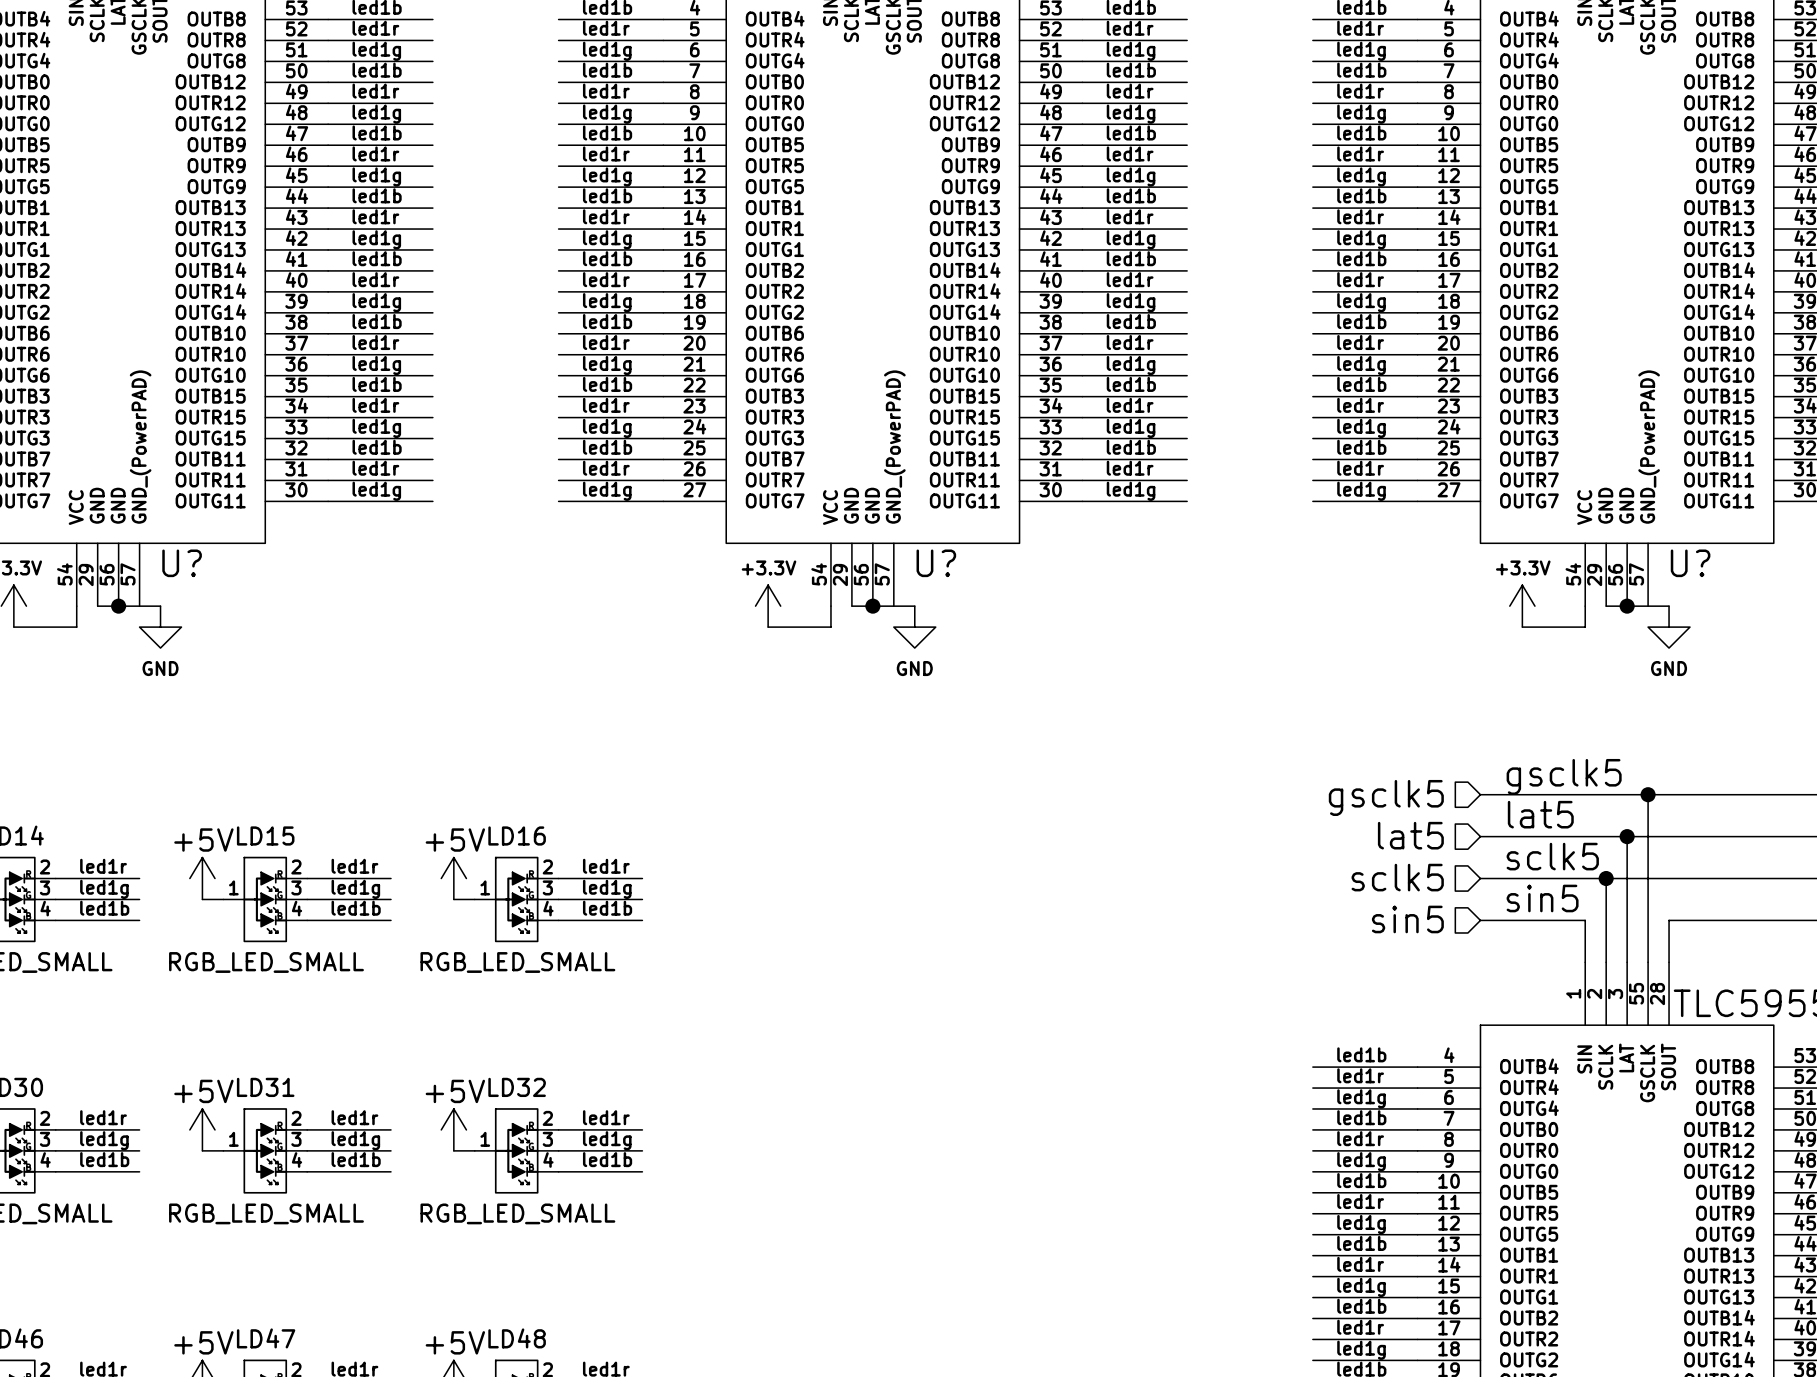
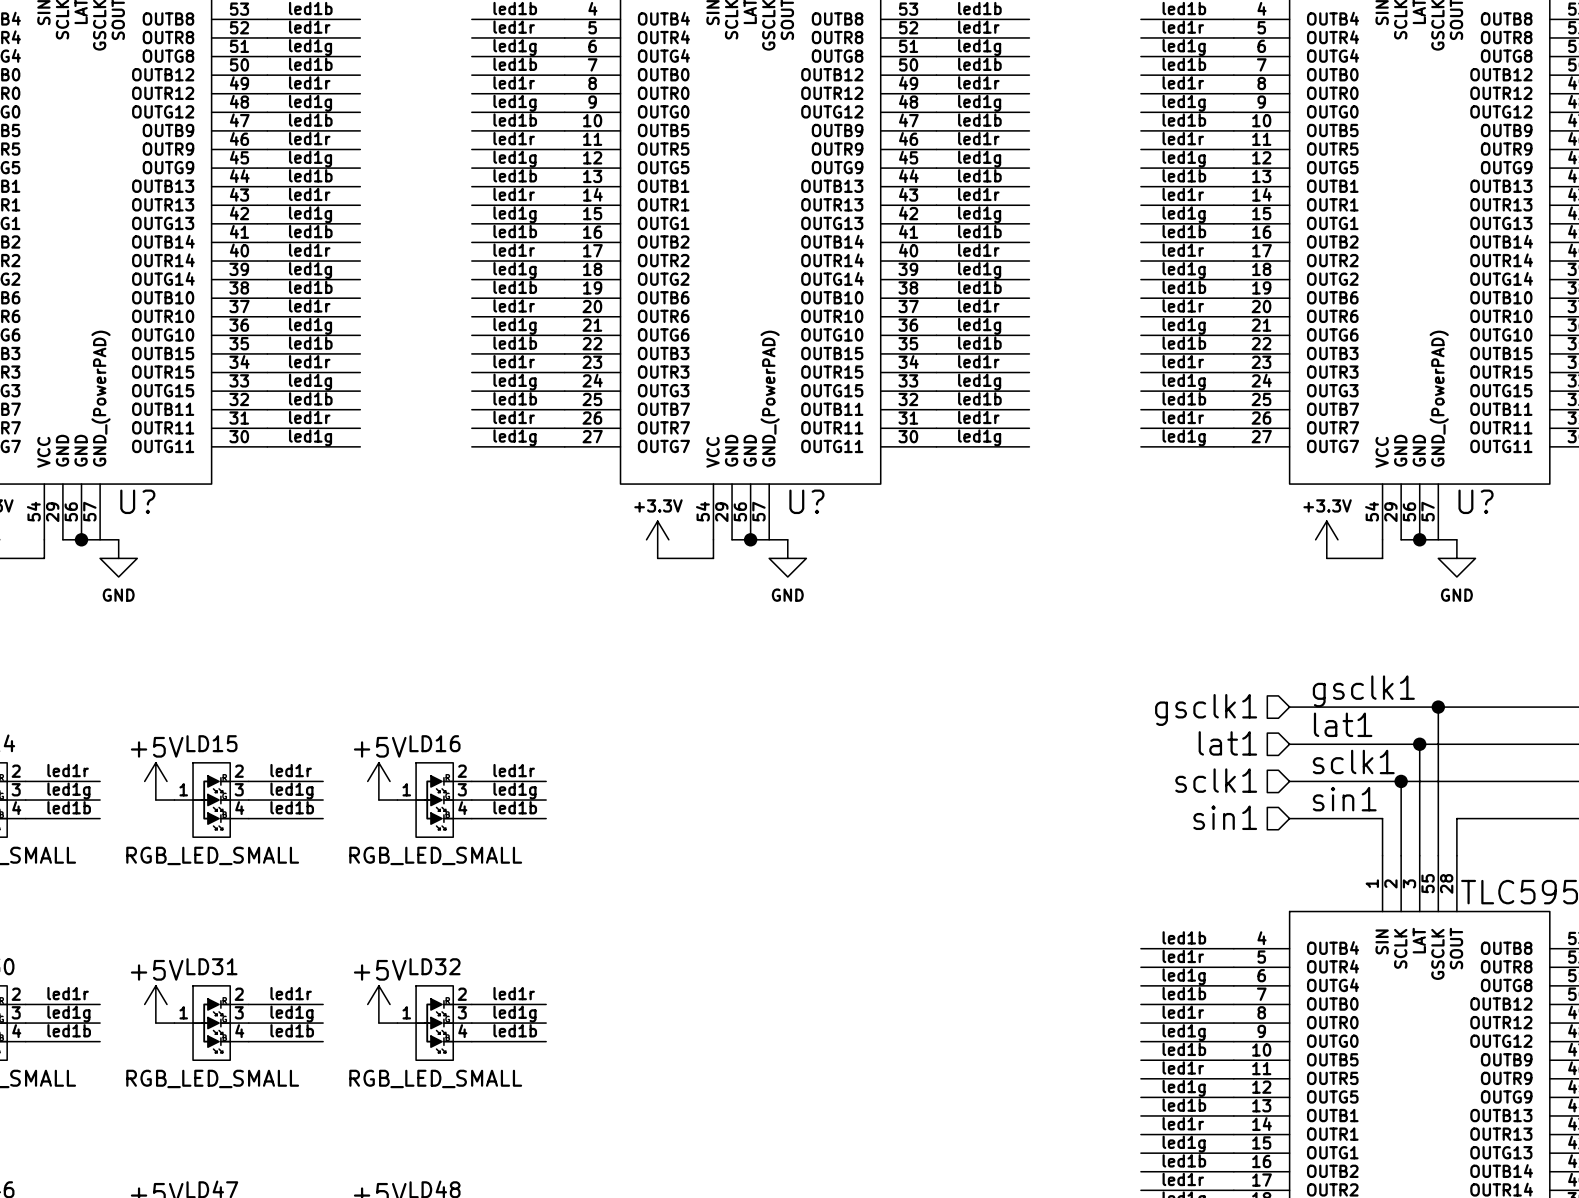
label: gsclk5 (1564, 776) -> gsclk1 (1363, 691)
hierarchical label: gsclk5 (1386, 797) -> gsclk1 (1206, 709)
label: lat5 (1540, 814) -> lat1 (1343, 724)
hierarchical label: lat5 (1410, 835) -> lat1 (1227, 743)
label: sclk5 (1552, 856) -> sclk1 (1353, 761)
hierarchical label: sclk5 (1397, 877) -> sclk1 (1216, 780)
label: sin5 (1542, 898) -> sin1 (1344, 799)
hierarchical label: sin5 (1407, 919) -> sin1 (1225, 817)

